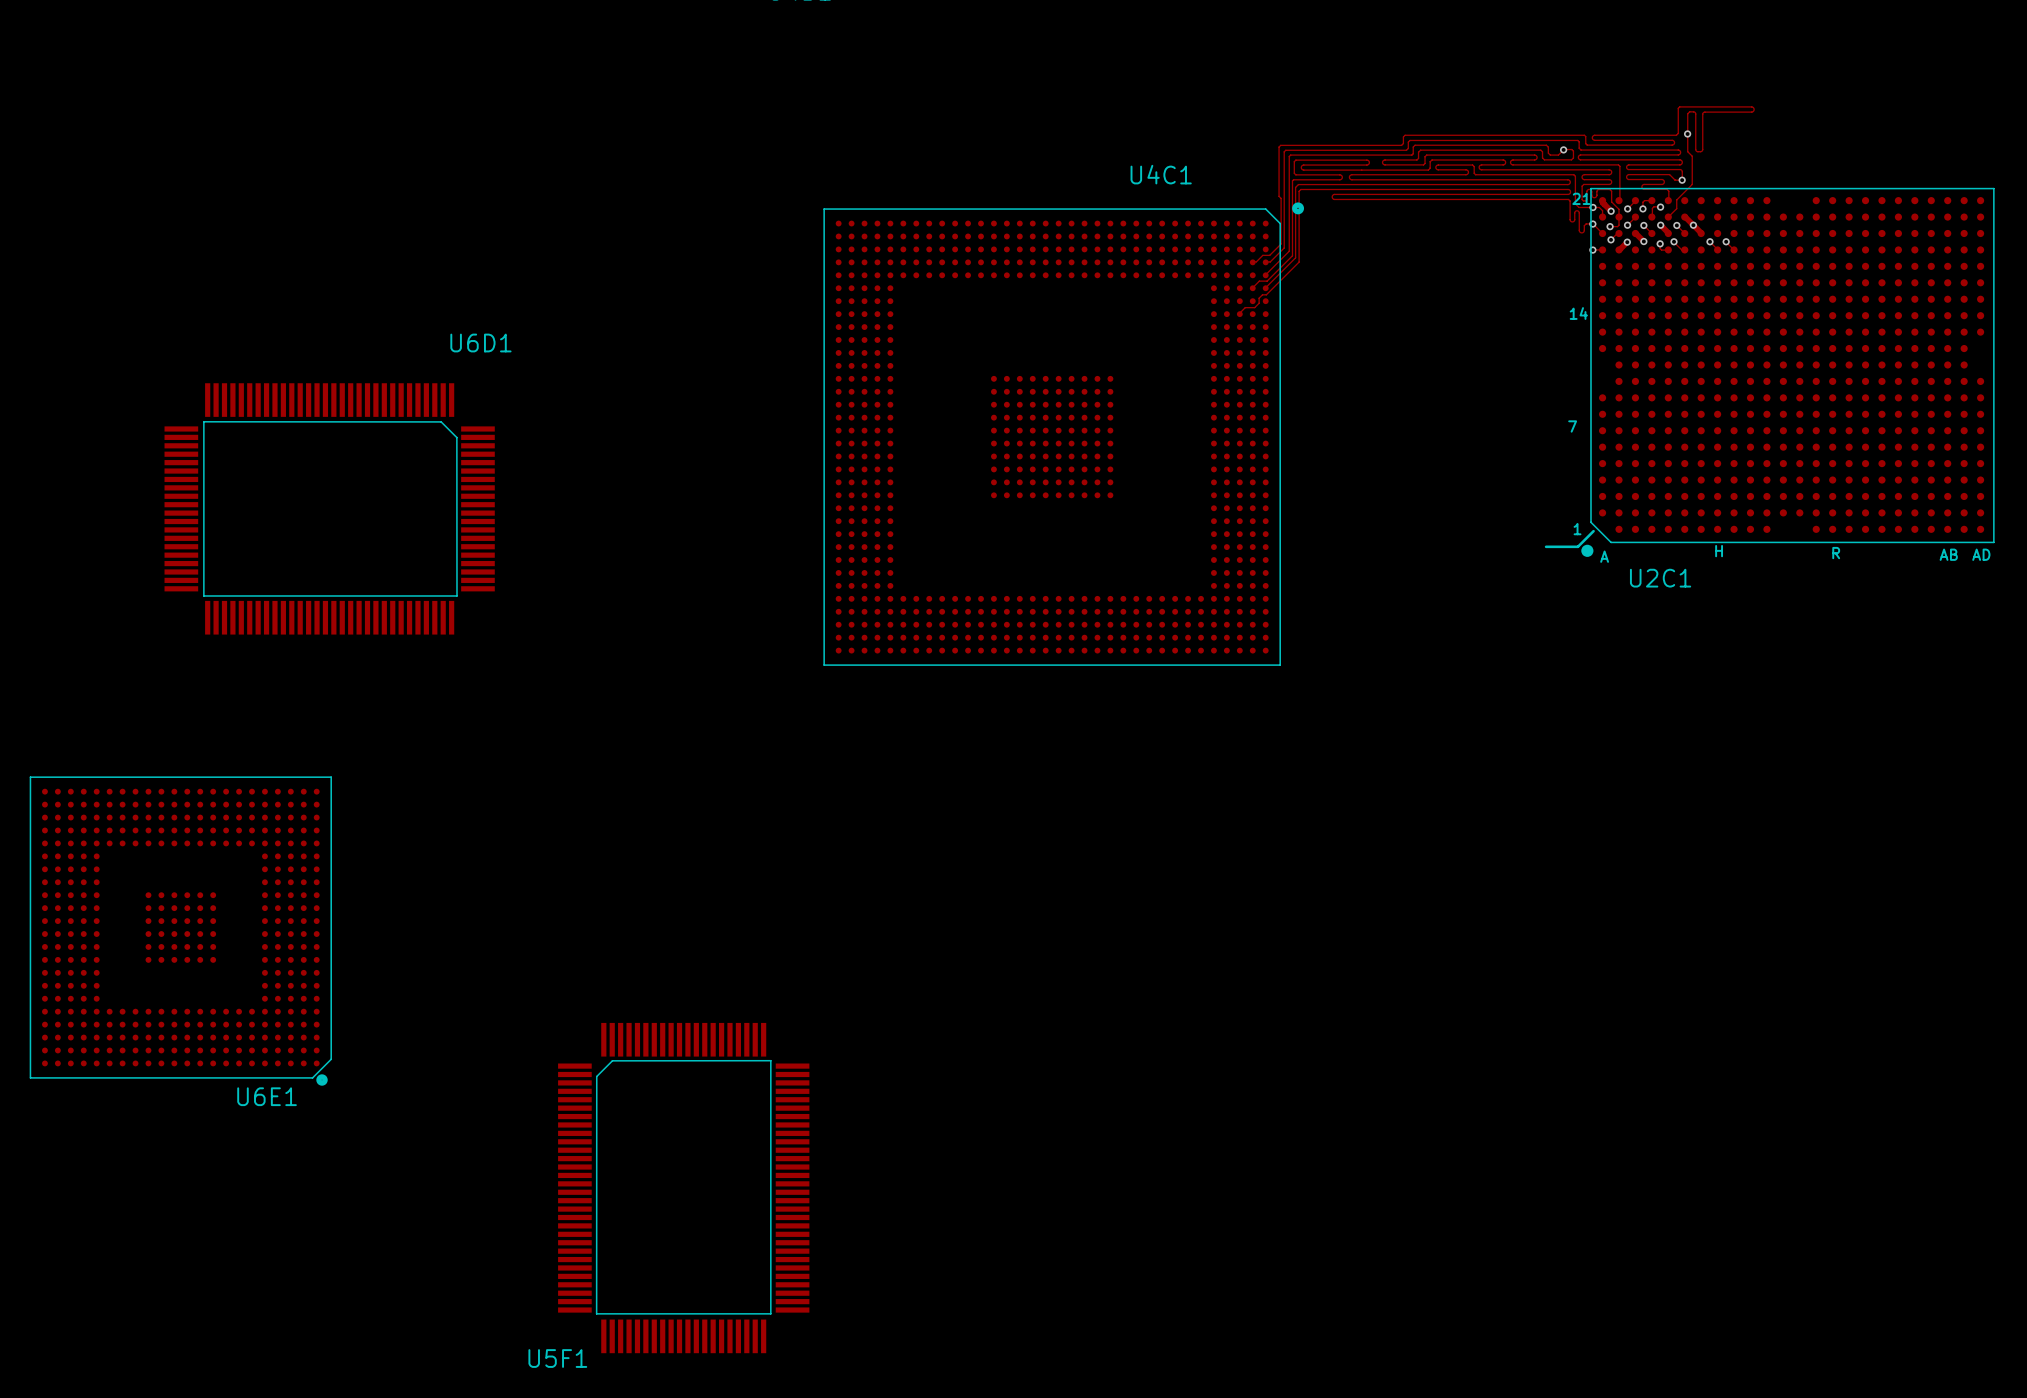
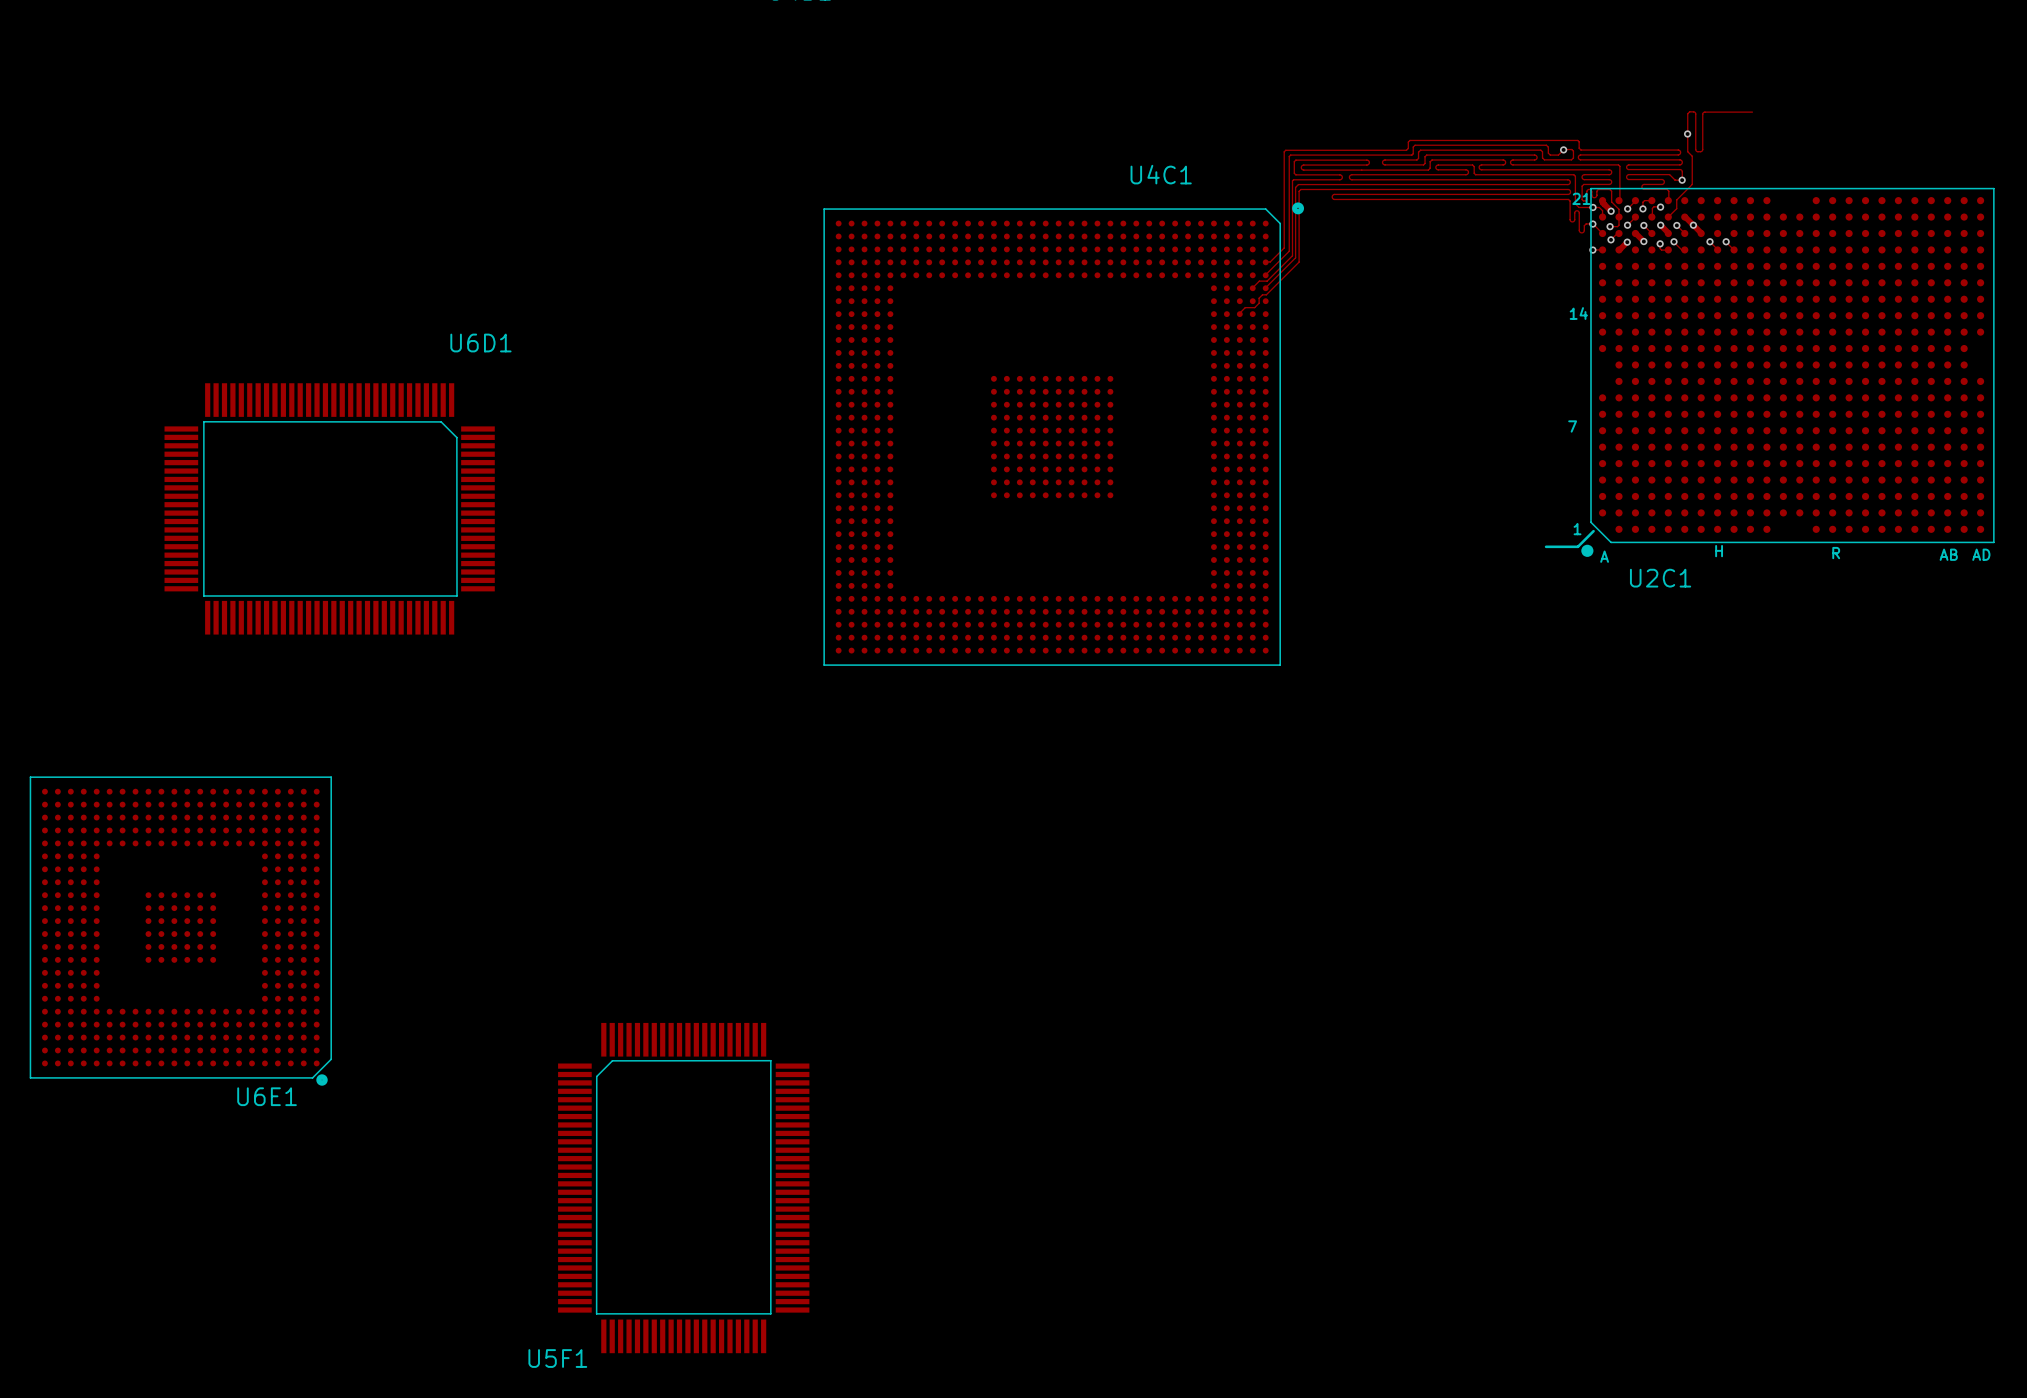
track: (1751, 112) (1754, 109) (1751, 106) (1679, 106) (1678, 133) (1676, 135) (1594, 135) (1592, 137) (1594, 140) (1672, 140) (1674, 143) (1672, 145) (1587, 145) (1584, 135) (1405, 135) (1401, 145) (1280, 145) (1279, 147) (1279, 196) (1281, 198) (1281, 243) (1269, 255) (1262, 255) (1256, 261) (1252, 262) -> (1751, 112) (1752, 112)

